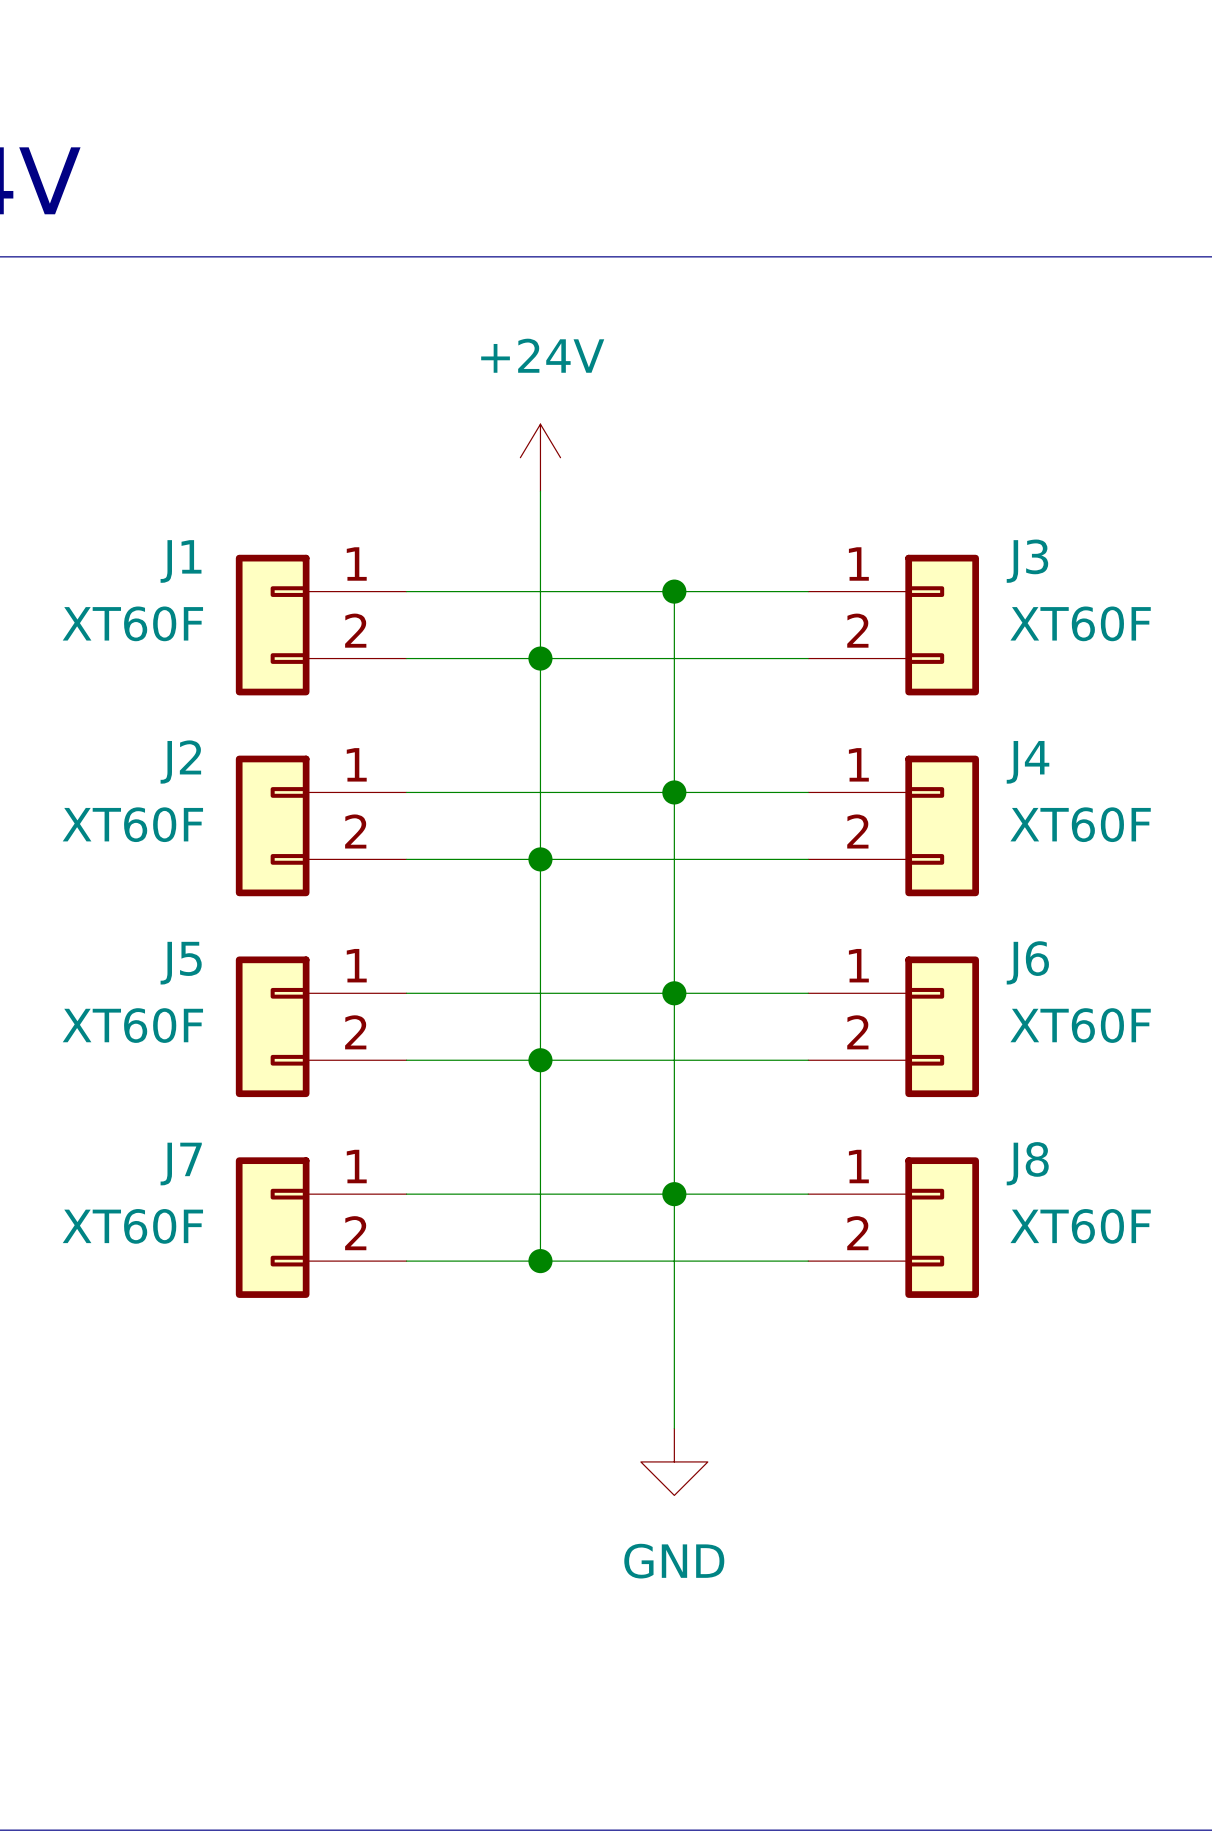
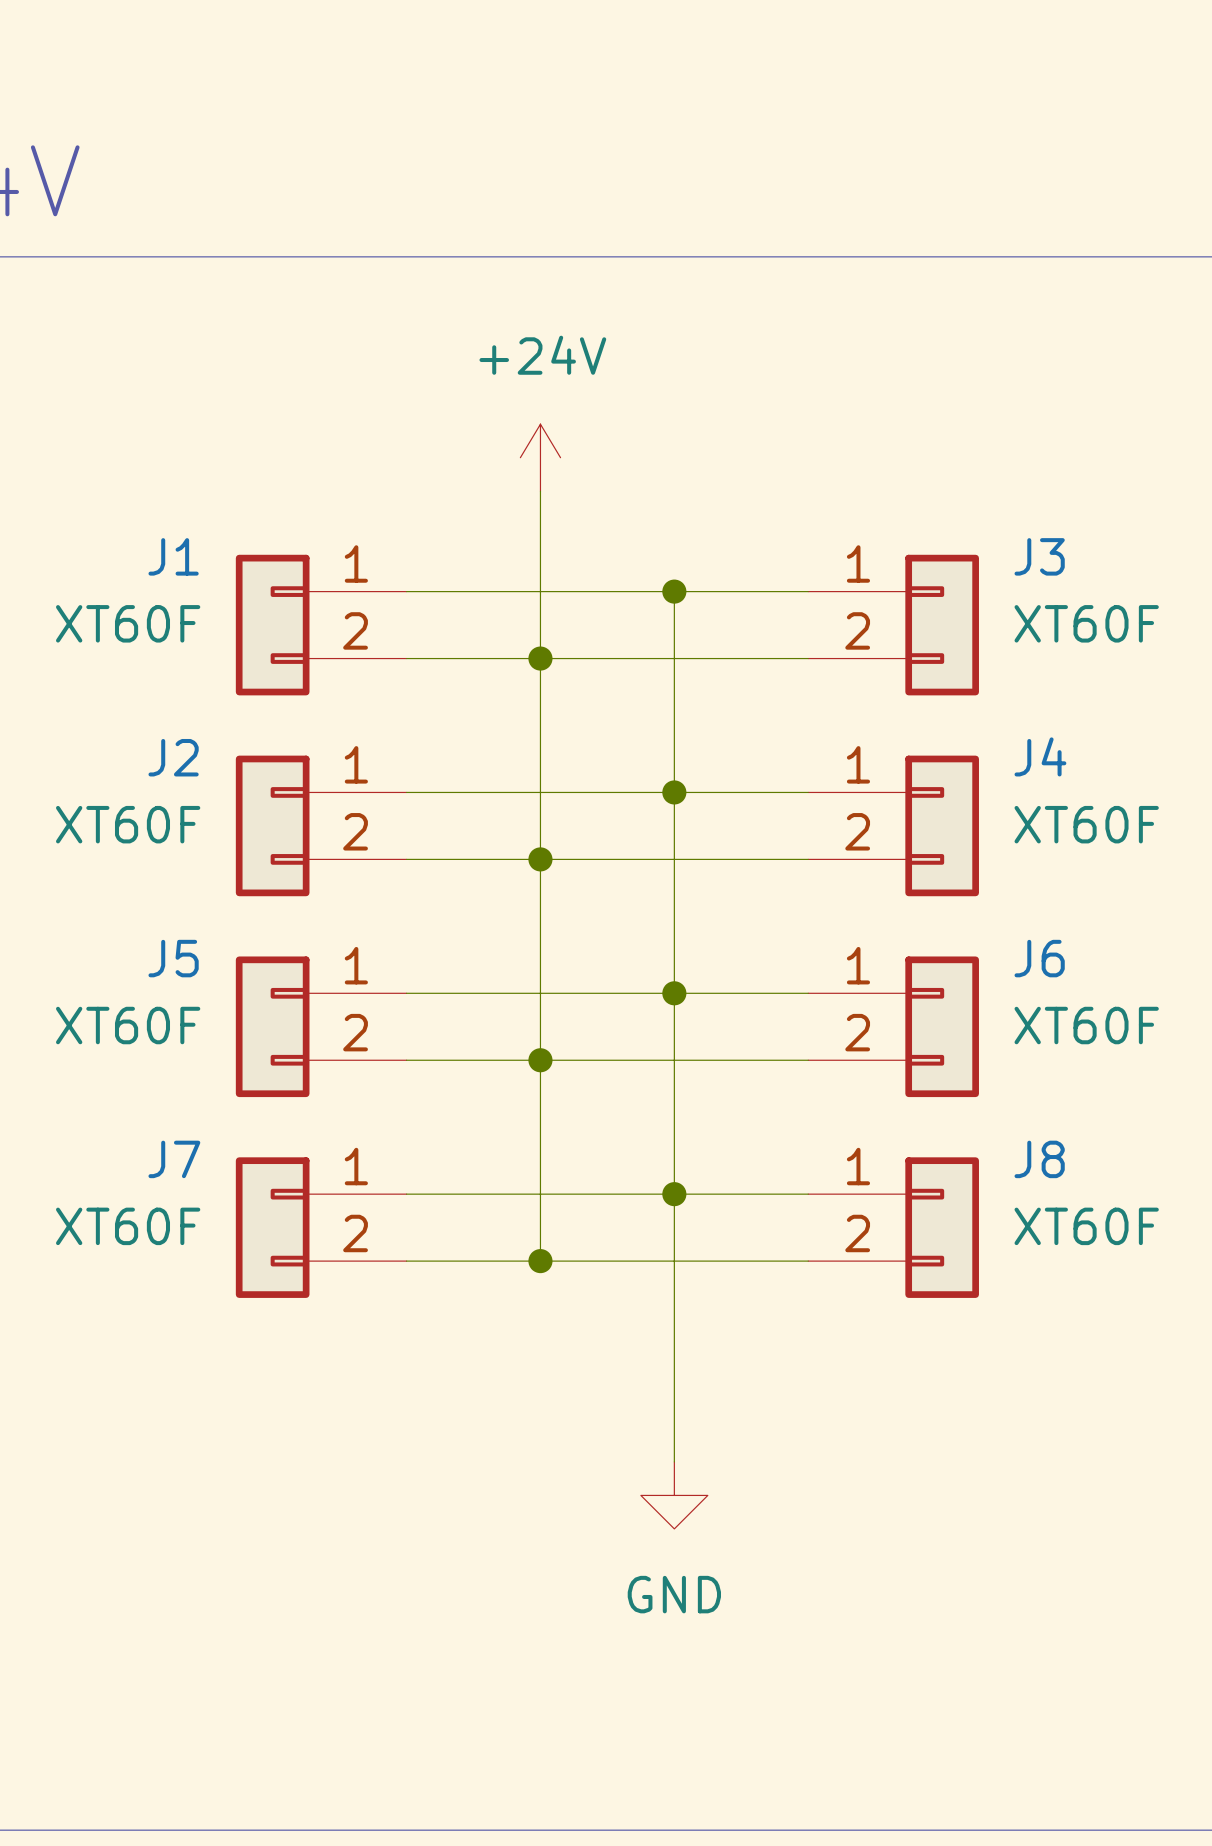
power symbol position: GND (674, 1461) -> GND (674, 1495)

